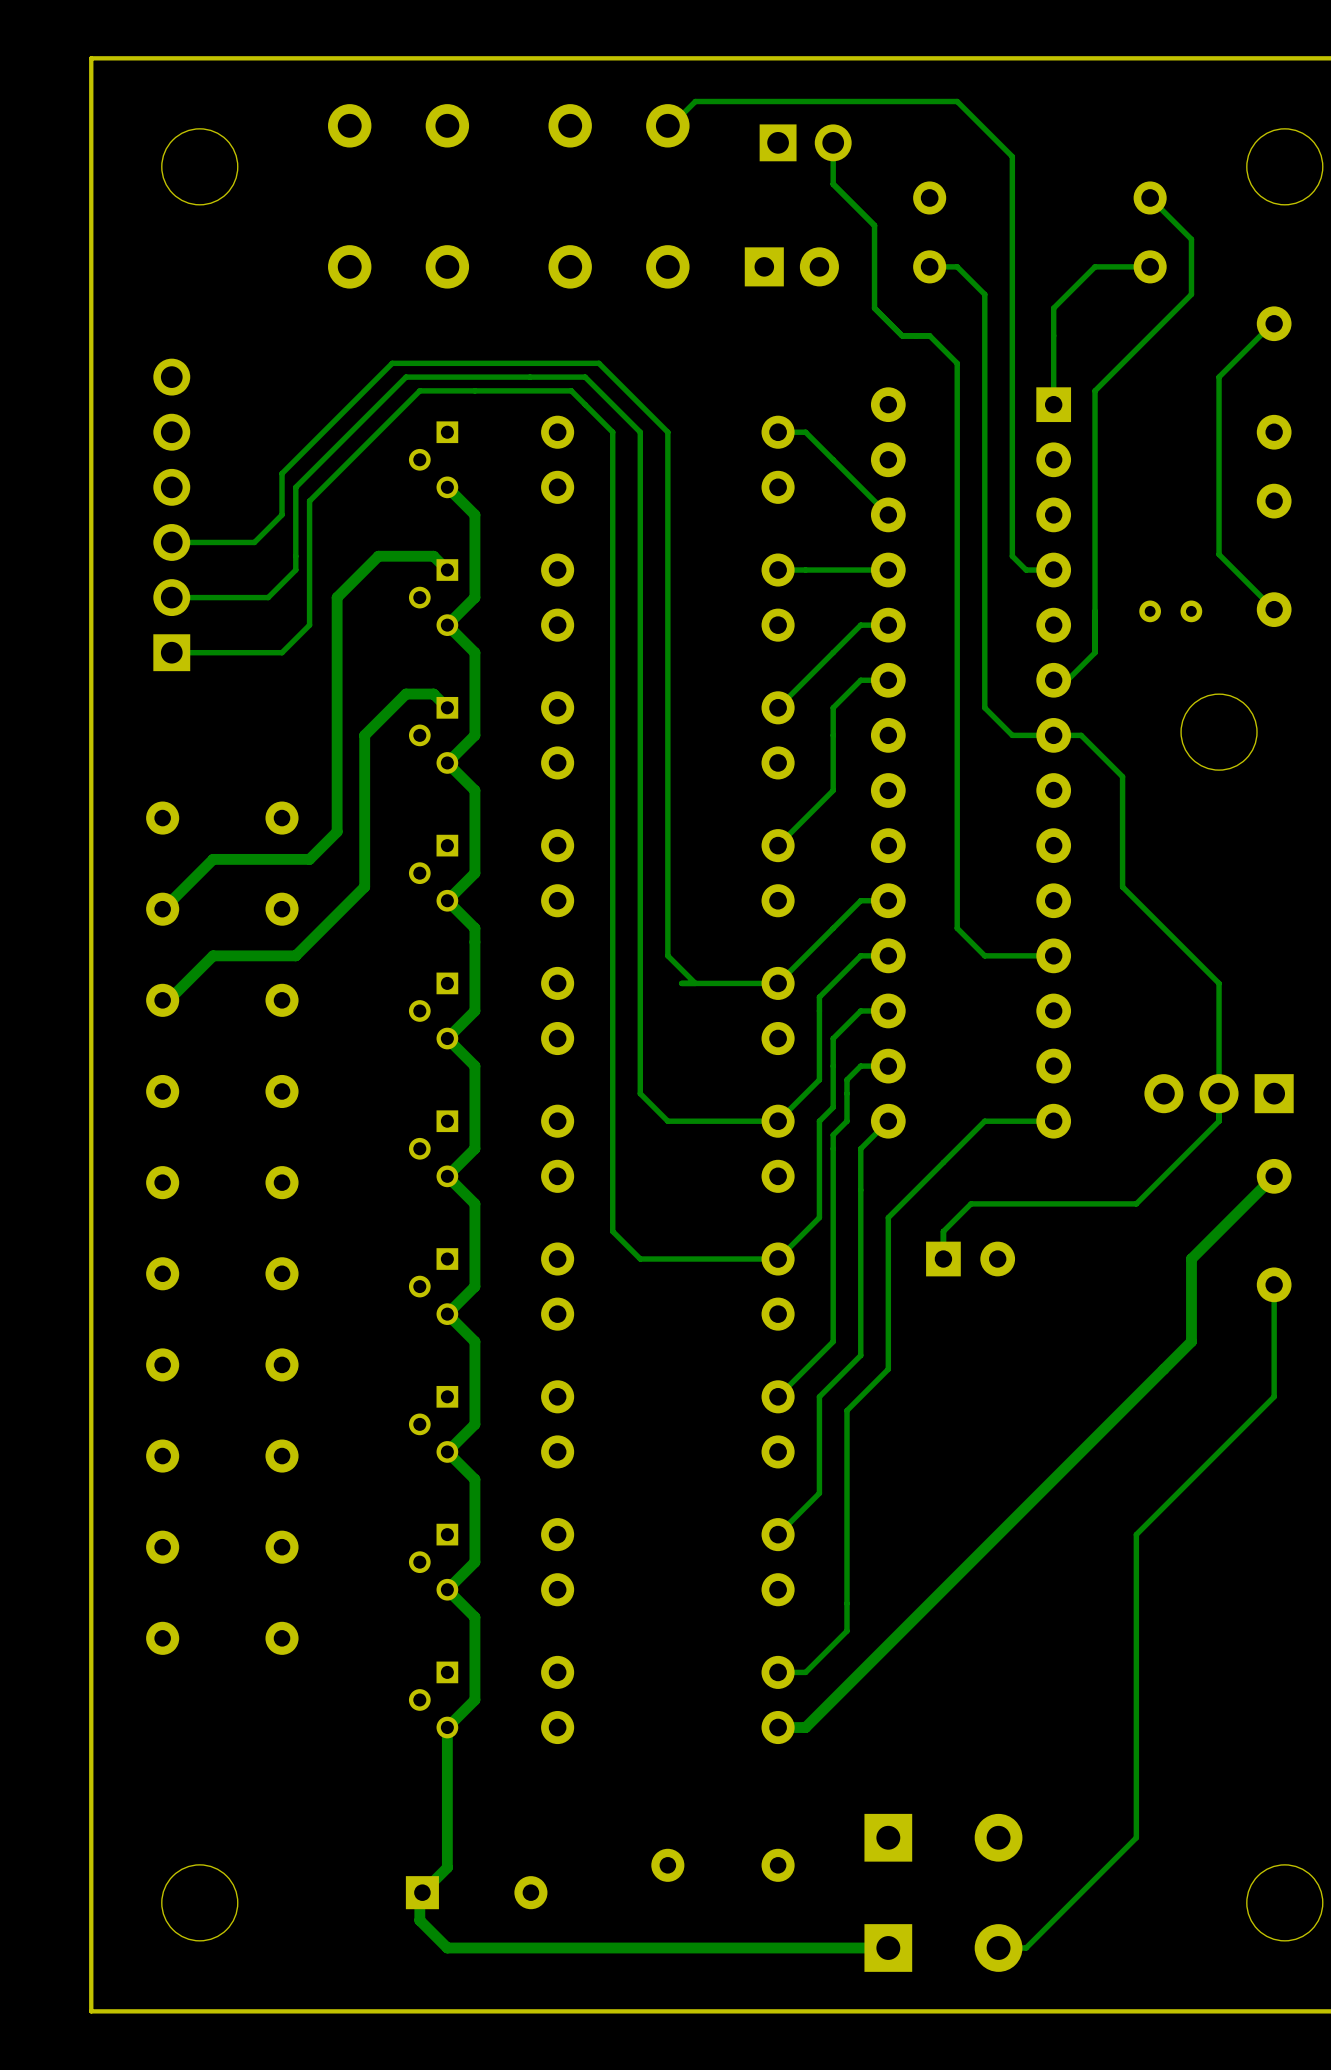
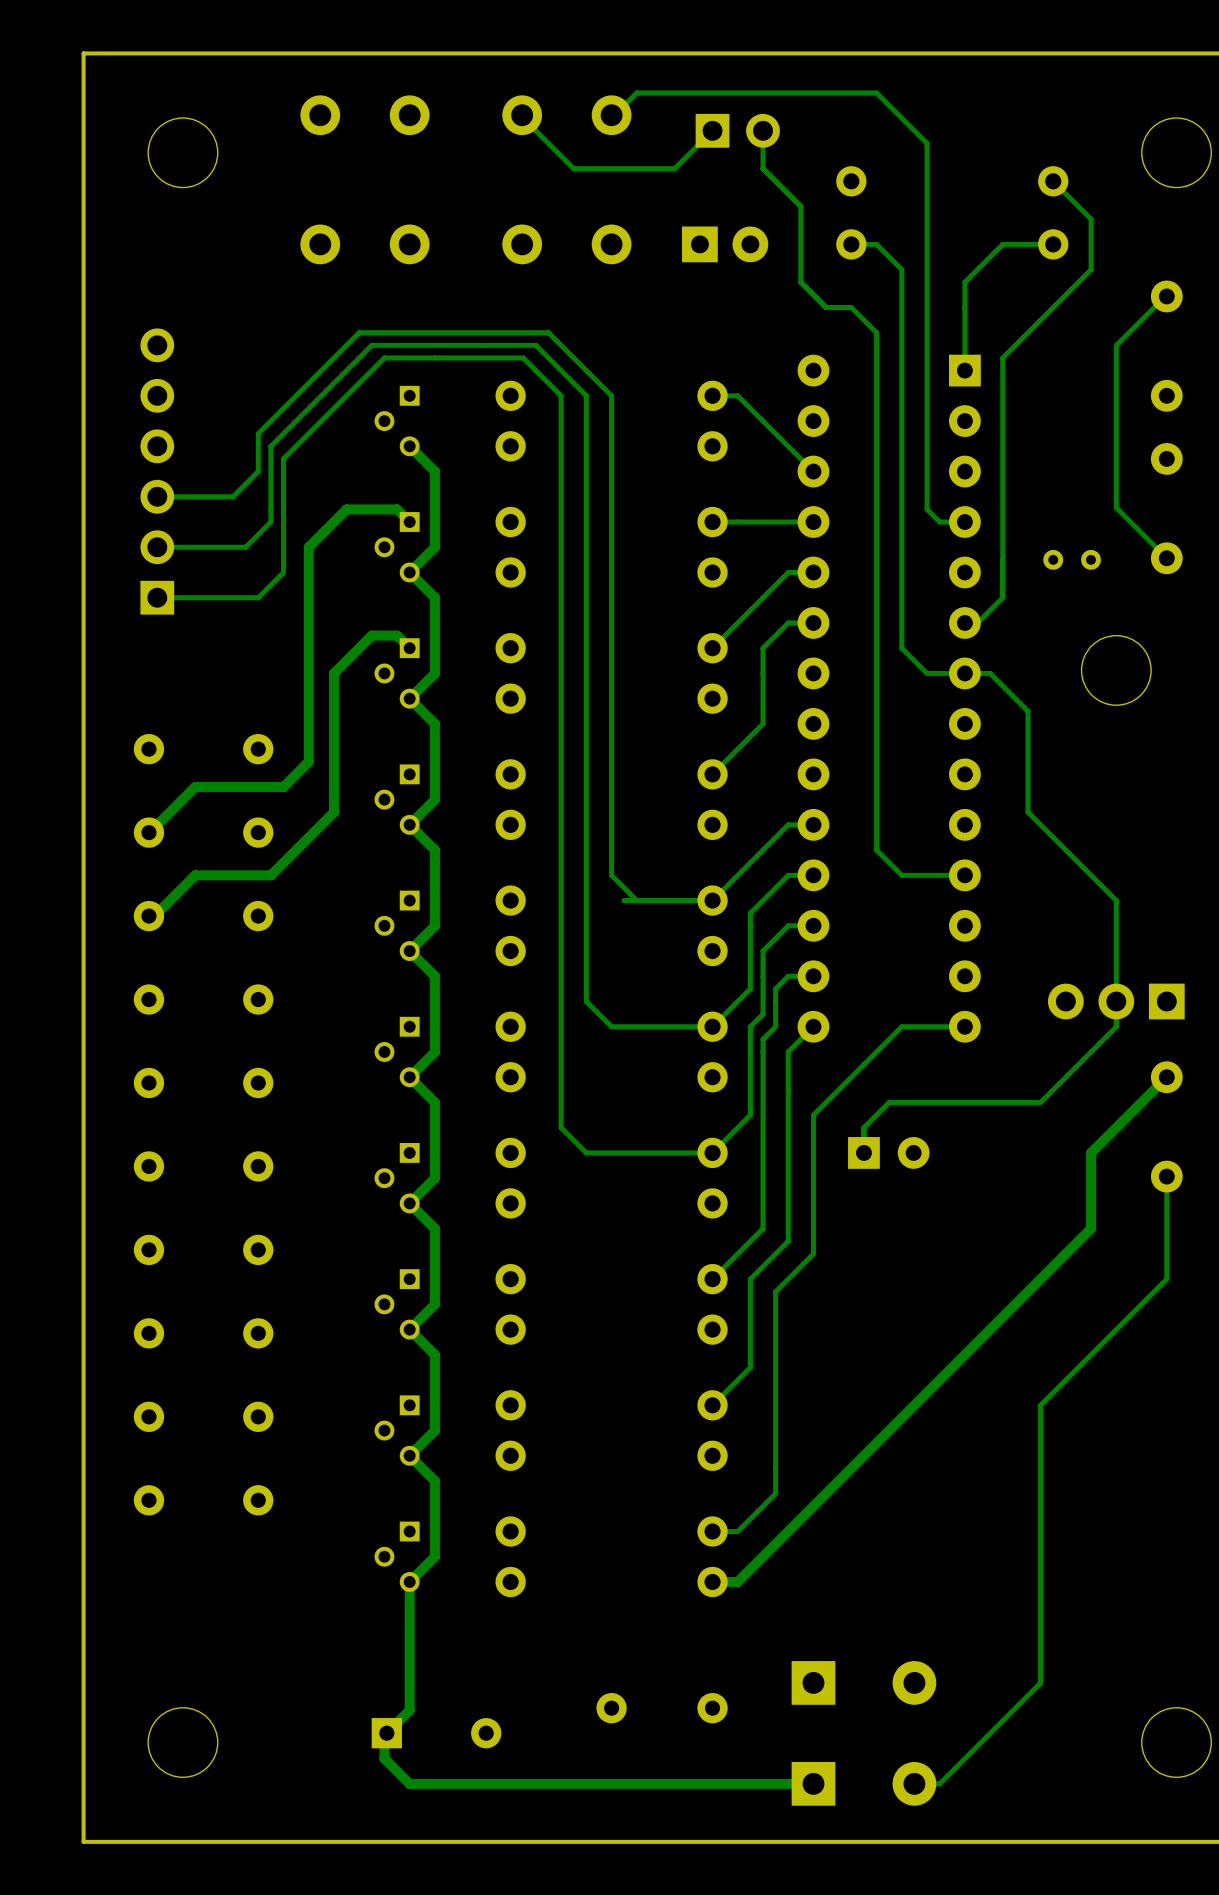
track: none -> (522, 117) (573, 168) (674, 168) (712, 130)

